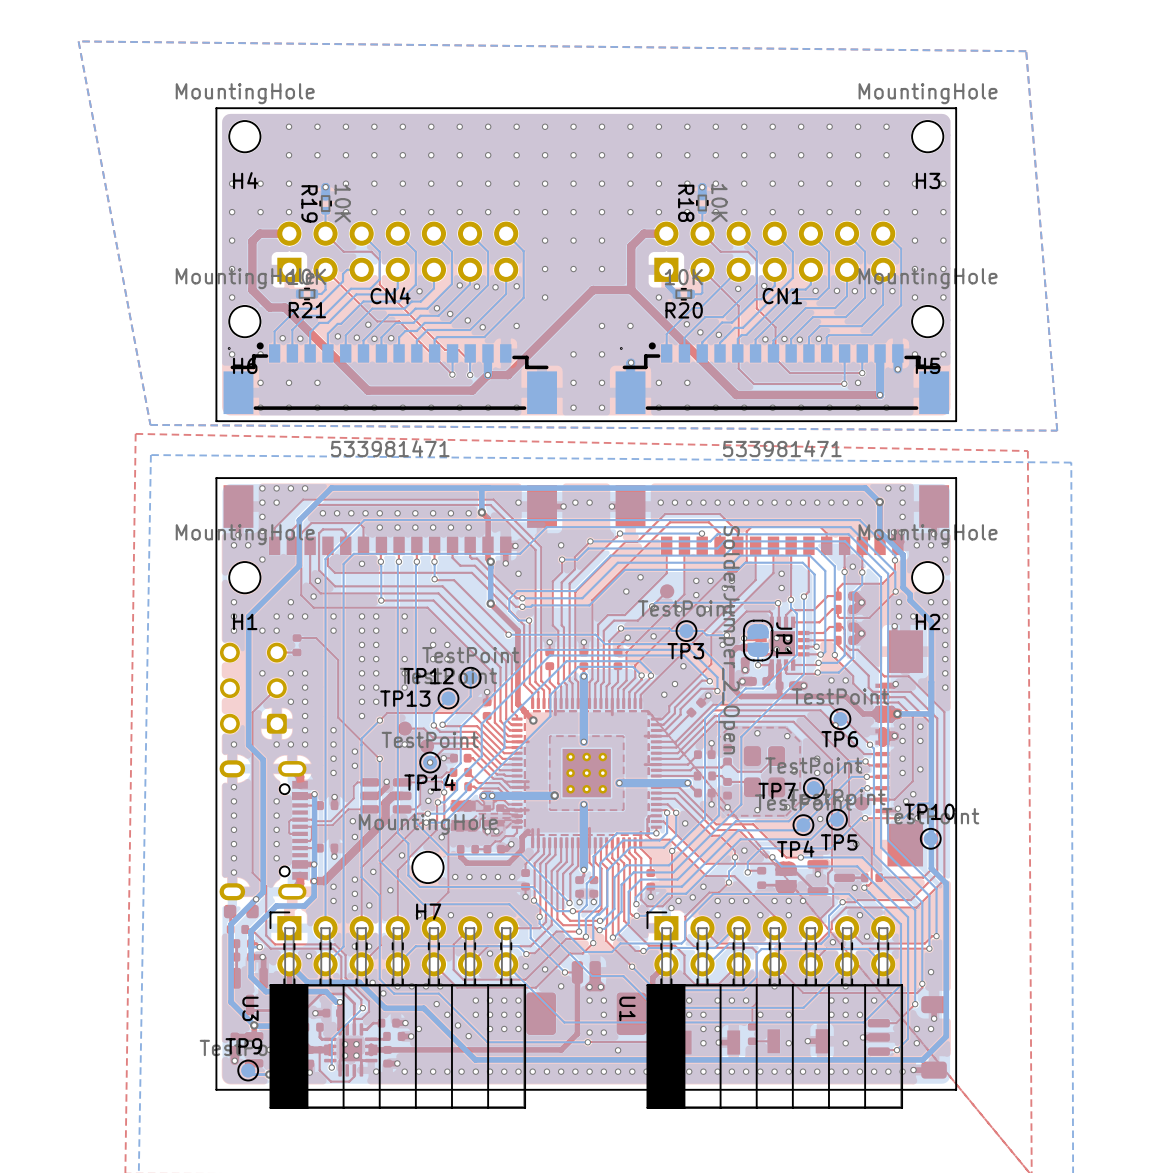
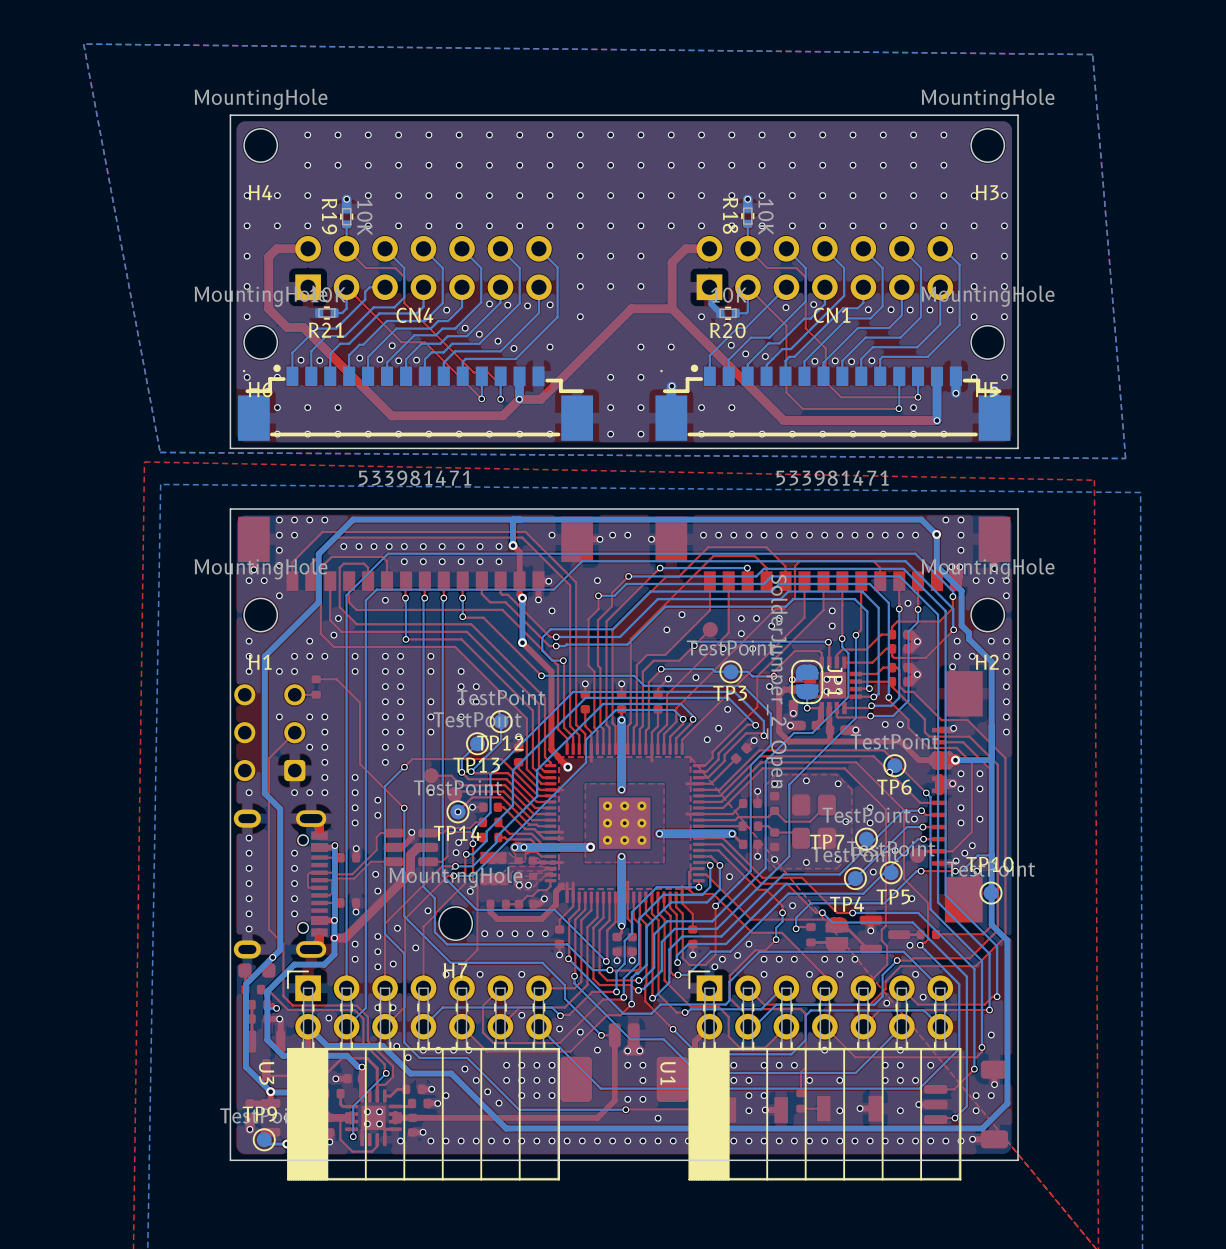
TP12 name position: TP12 (428, 676) -> TP12 (500, 742)
TP13 name position: TP13 (405, 698) -> TP13 (476, 765)

